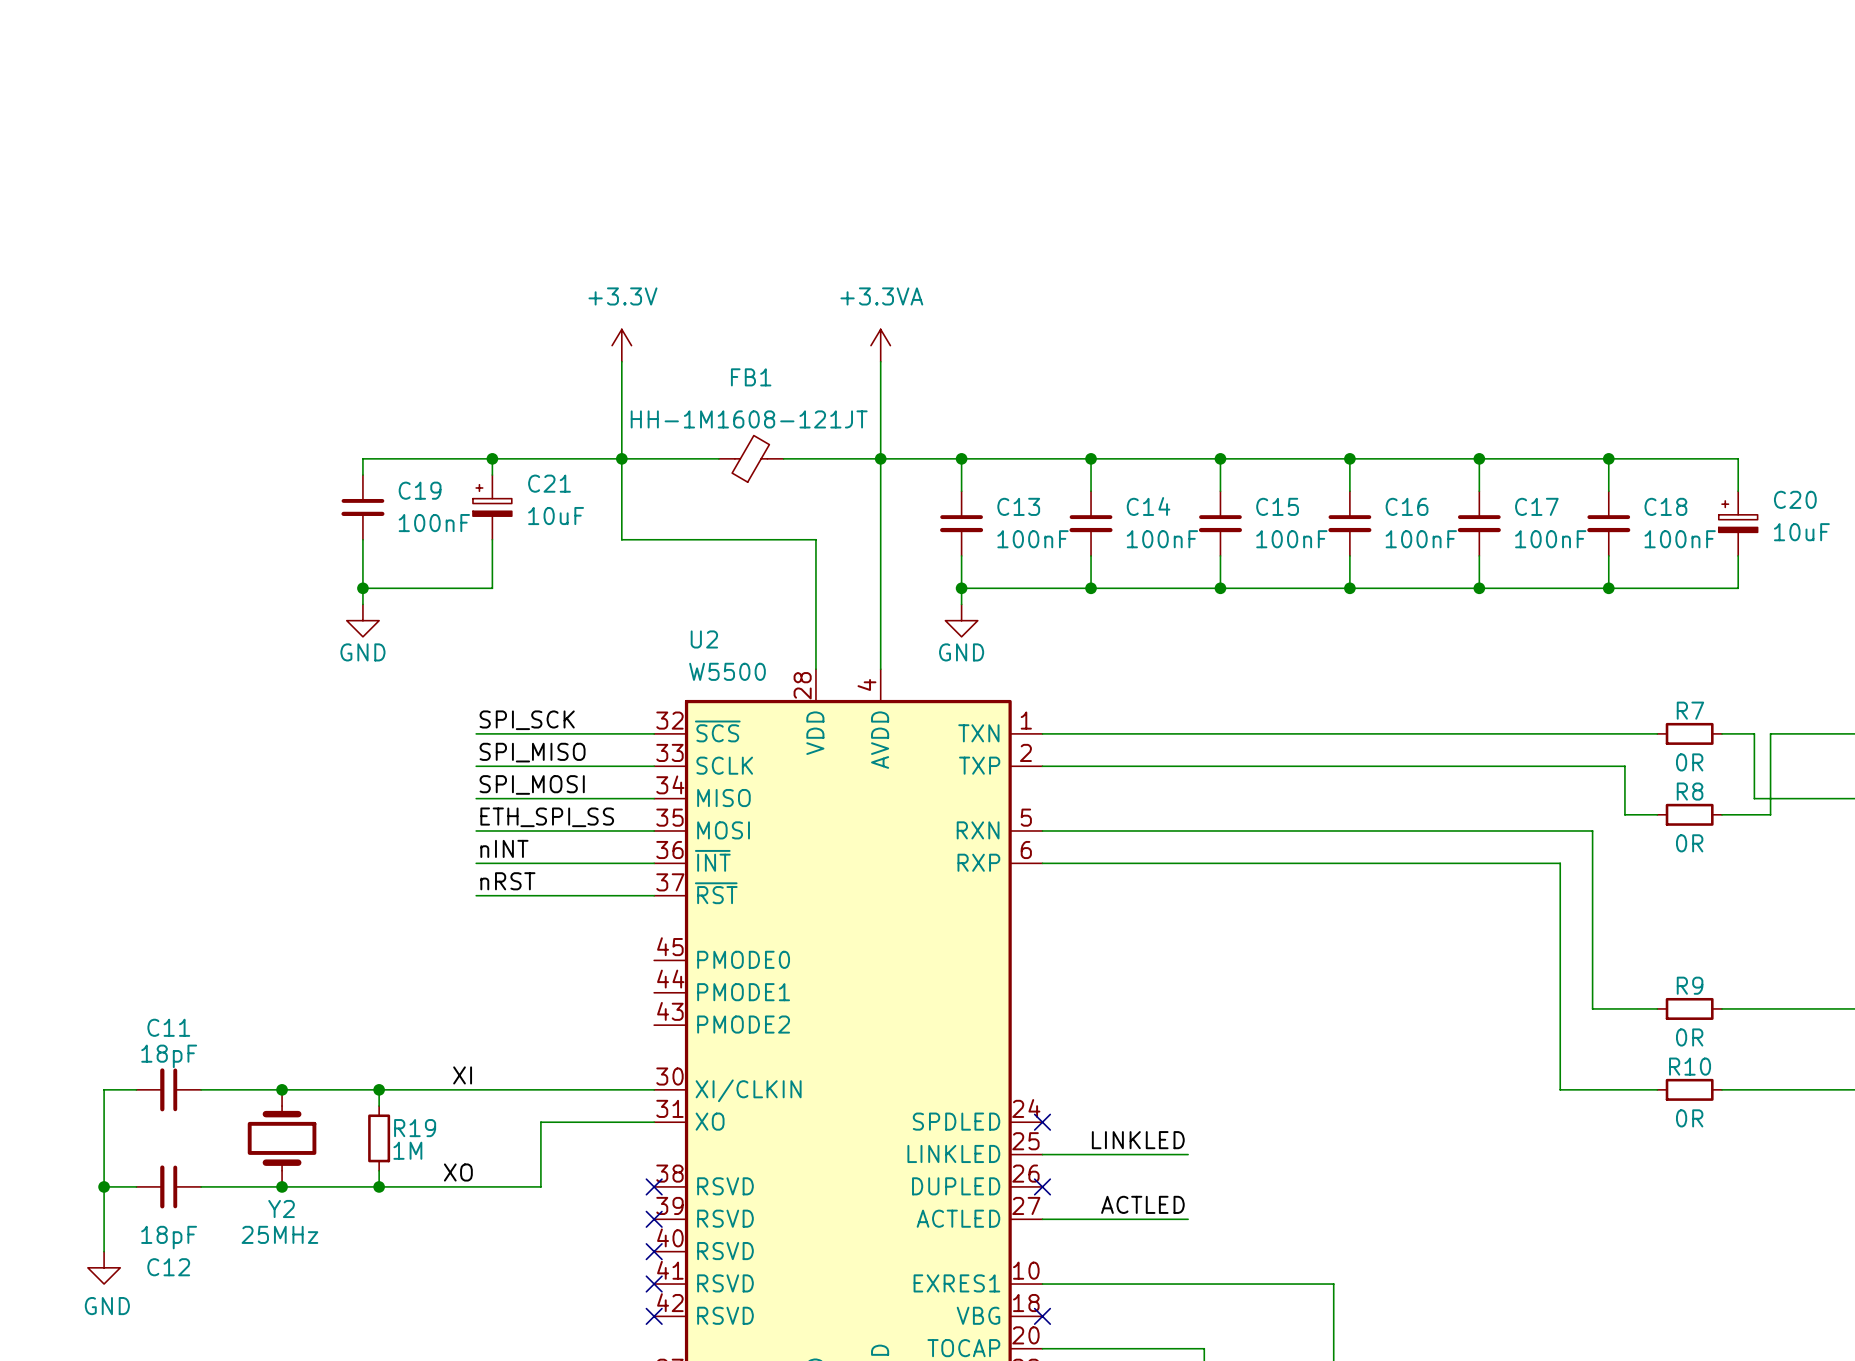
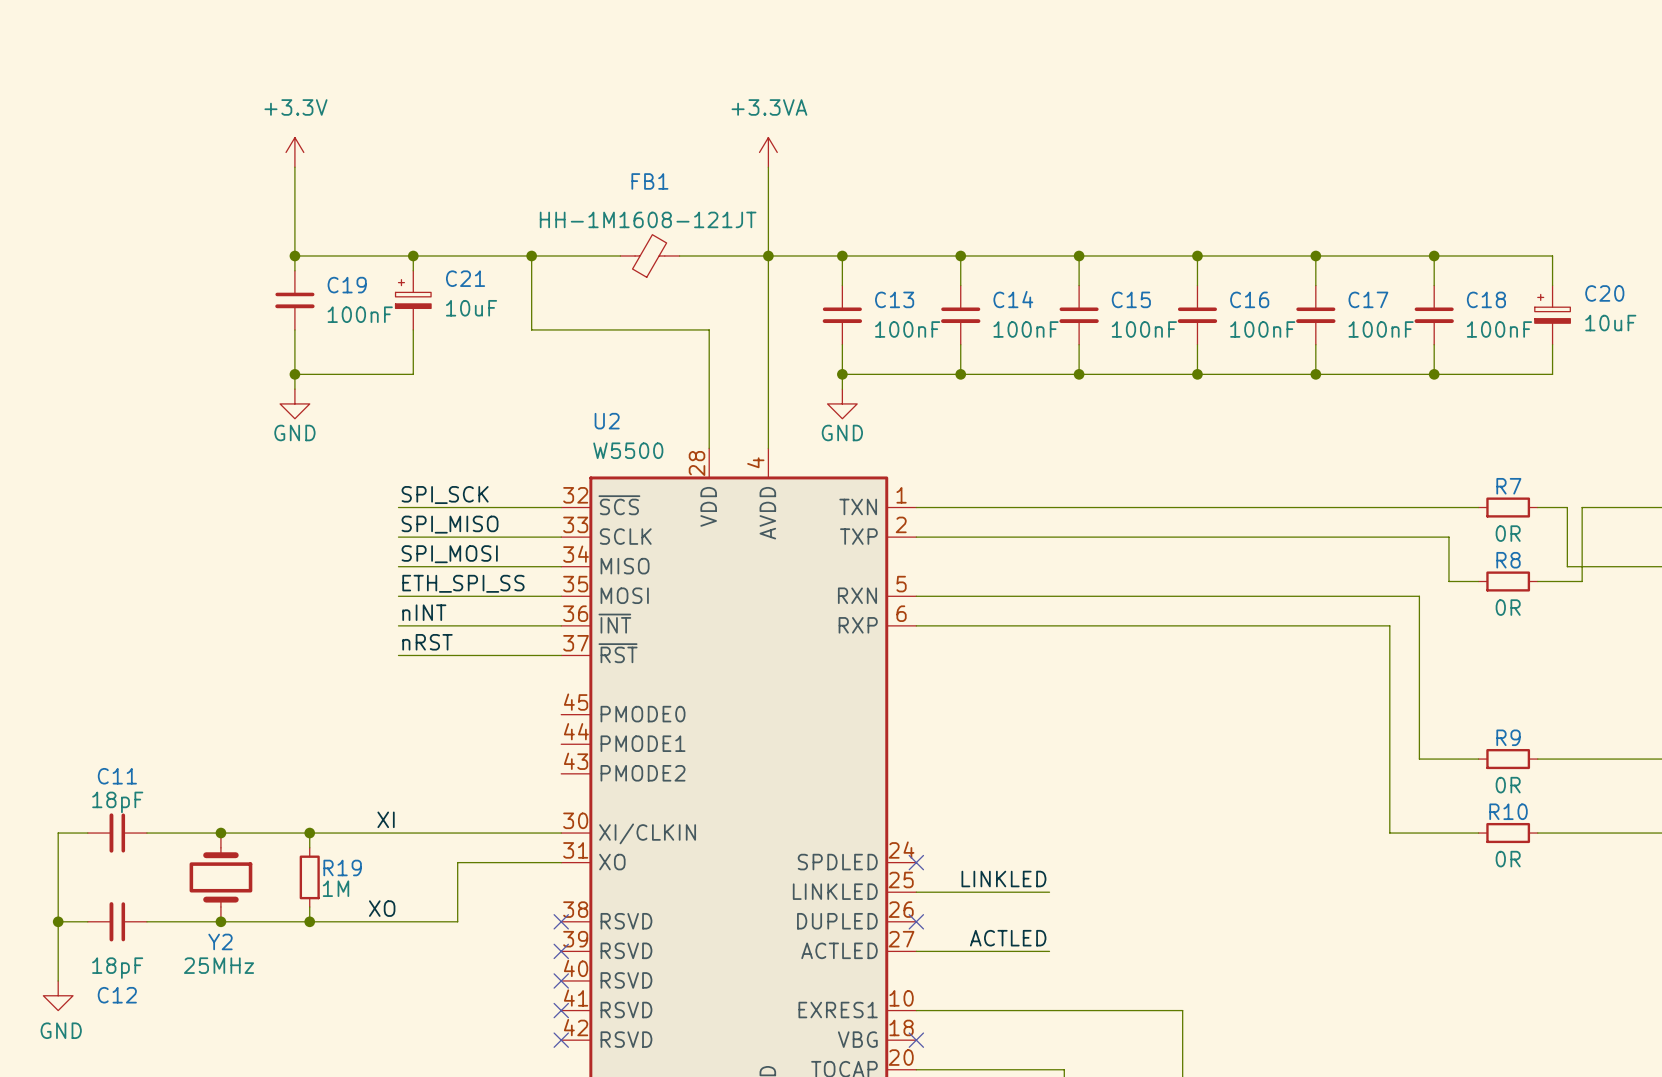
power symbol position: +3.3V (621, 345) -> +3.3V (294, 152)
wire: (621, 361) (621, 458) -> (294, 167) (294, 255)
junction: none -> (294, 255)

